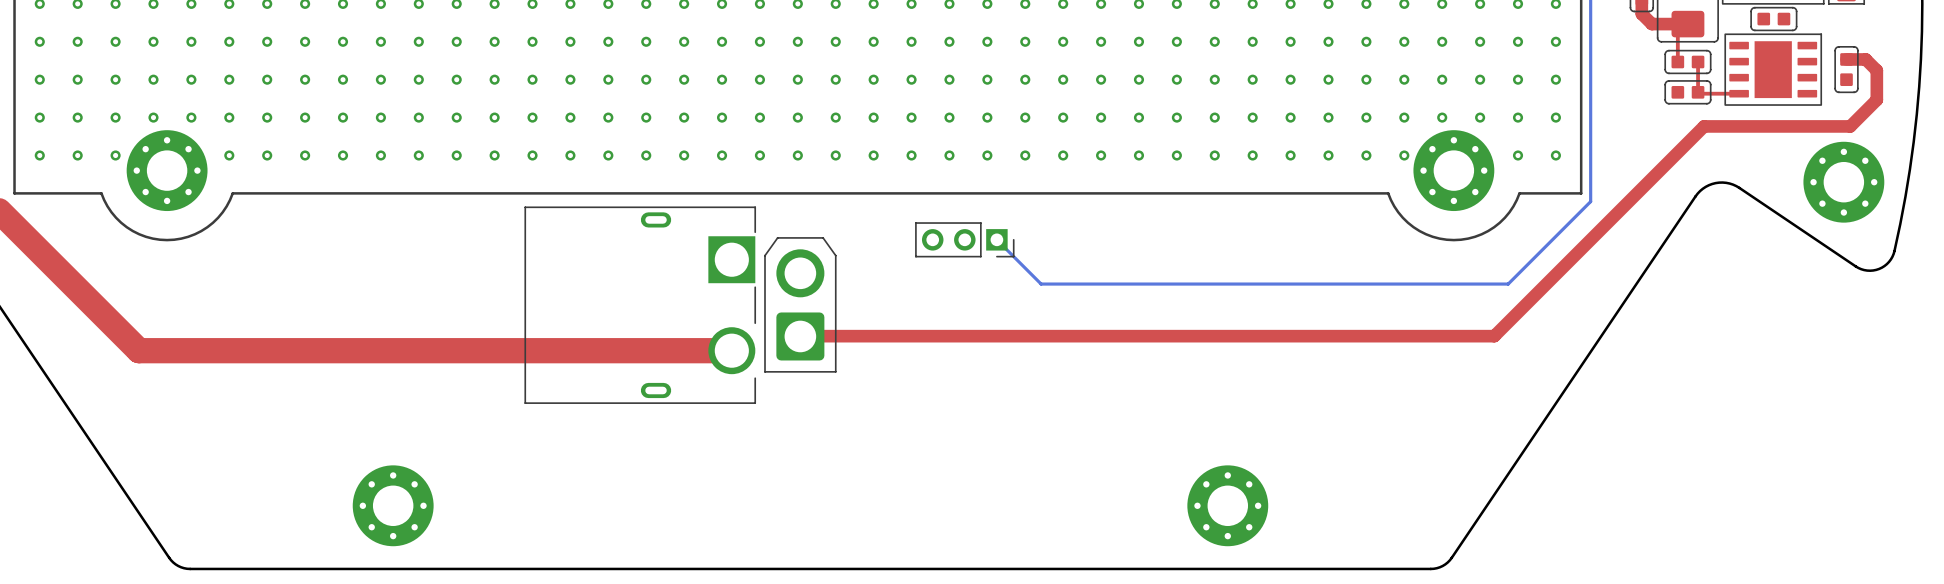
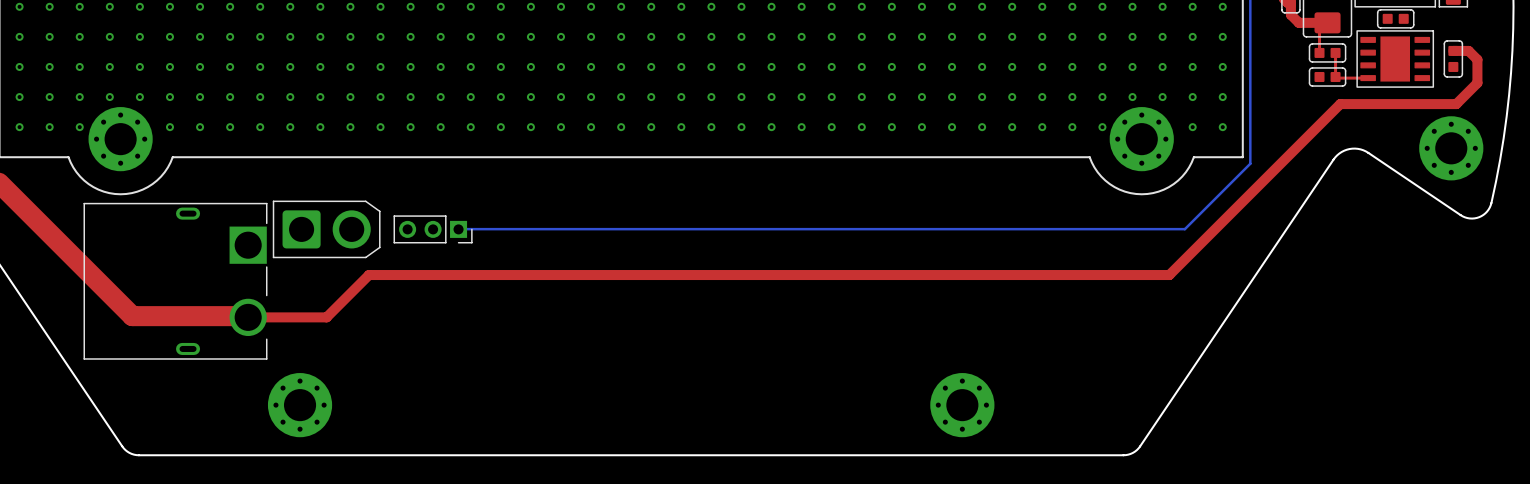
part: (964, 239) -> none
bottom track: (996, 239) (1041, 284) -> (458, 229) (814, 229)
part: none -> (326, 229)
part: none -> (433, 229)
part: (800, 304) -> none
part: (640, 305) -> none
top track: (1494, 336) (800, 336) -> (1173, 270) (1169, 275) (369, 275) (326, 317) (132, 316) (98, 282)
part: none -> (175, 281)
top track: (138, 350) (731, 350) -> none

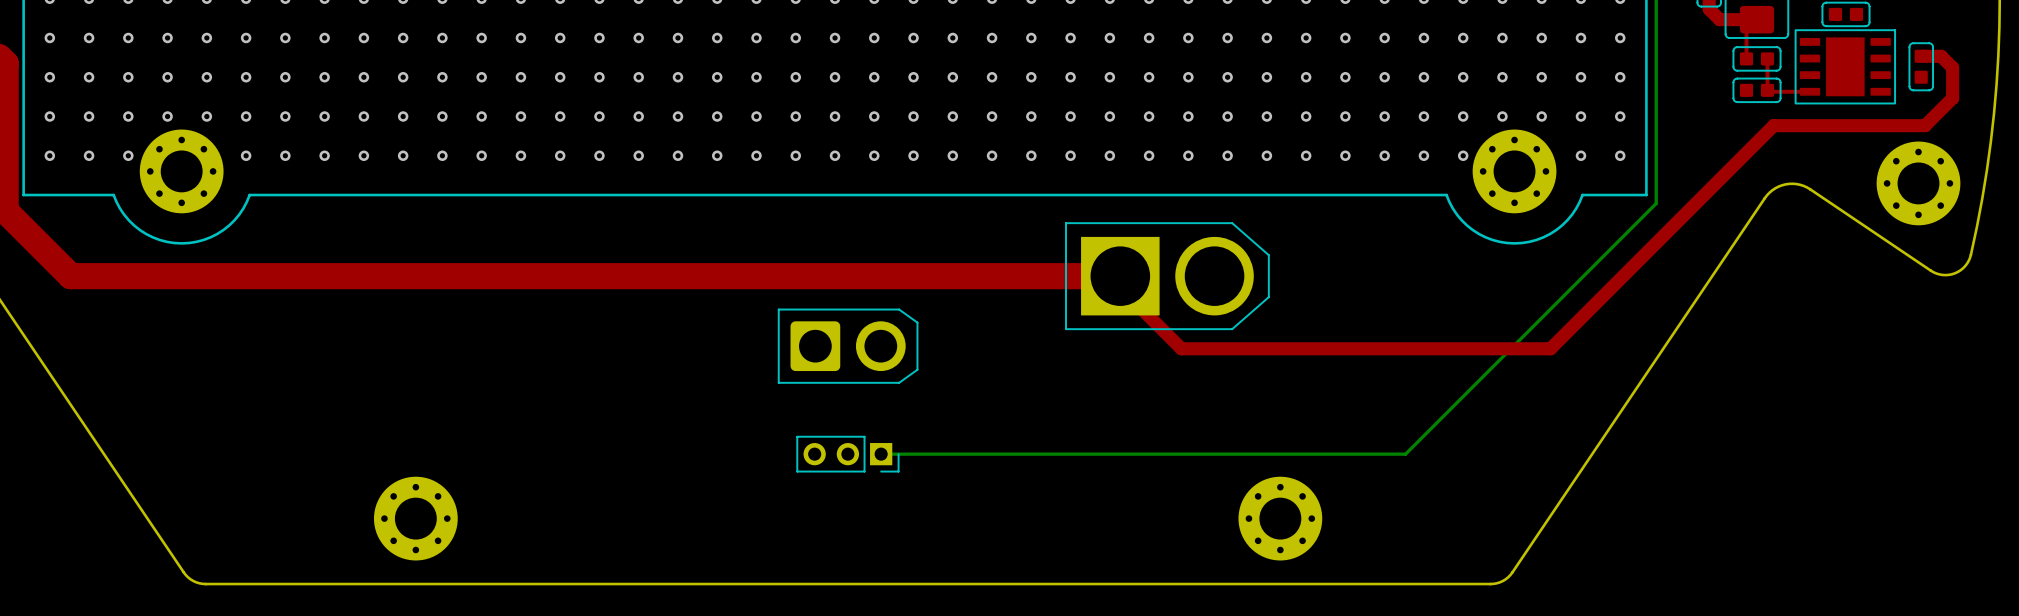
top track: (35, 219) (132, 316) (326, 317) (369, 275) (886, 275) -> (70, 276) (1120, 276)
part: none -> (1167, 276)
top track: none -> (1120, 287) (1181, 348)
part: (326, 229) -> none
part position: (433, 229) -> (847, 454)
bottom track: (1184, 229) (458, 229) -> (1570, 288) (1405, 454) (881, 454)
part: none -> (848, 346)
part: (175, 281) -> none

